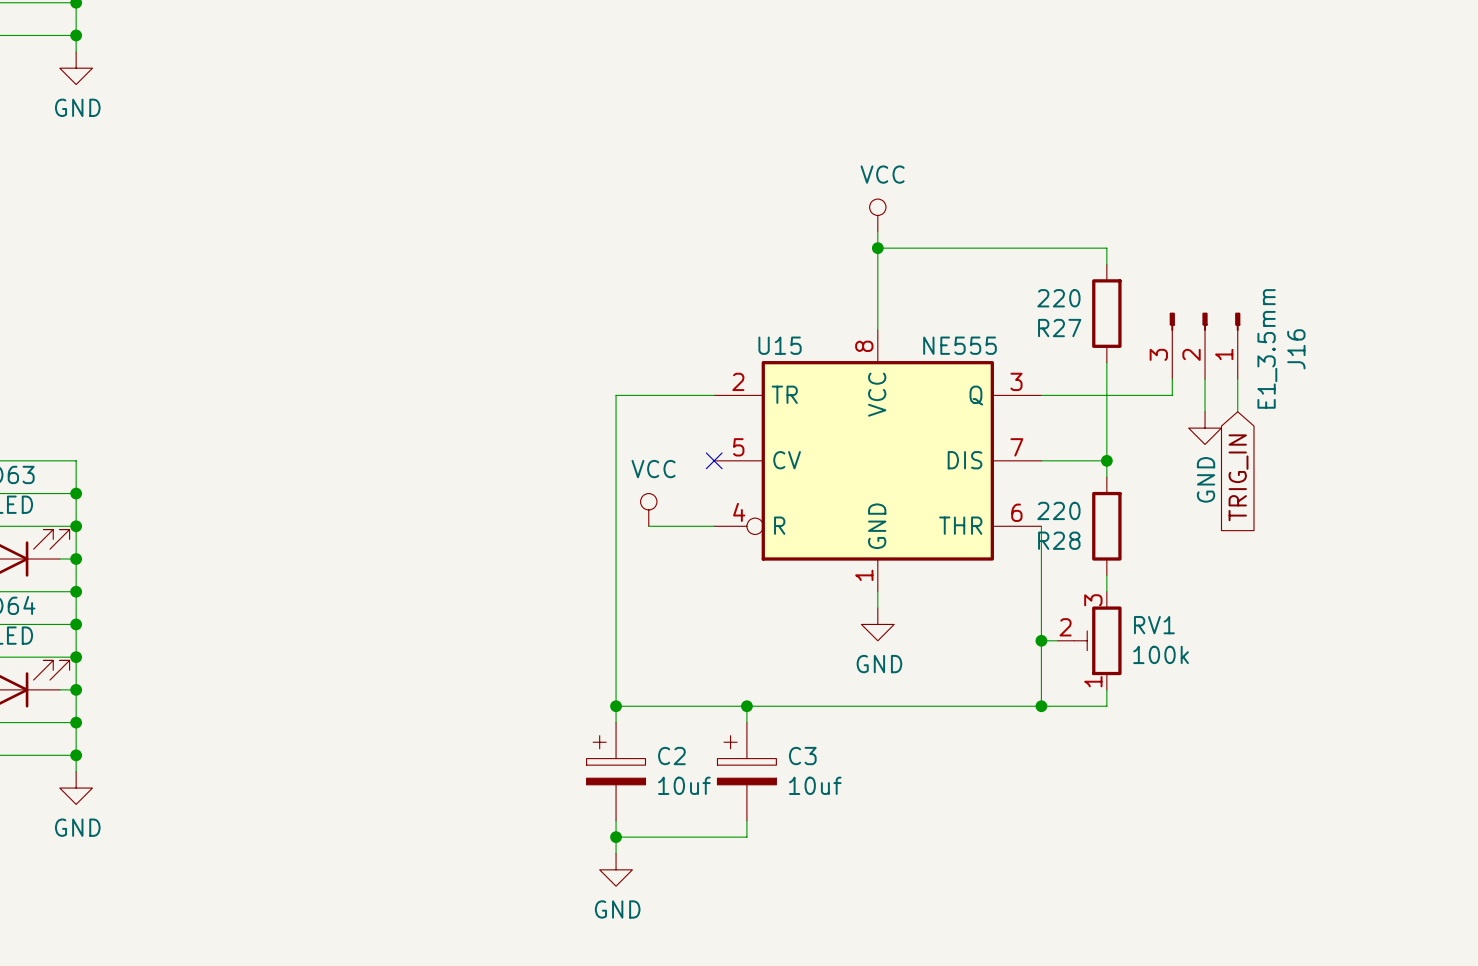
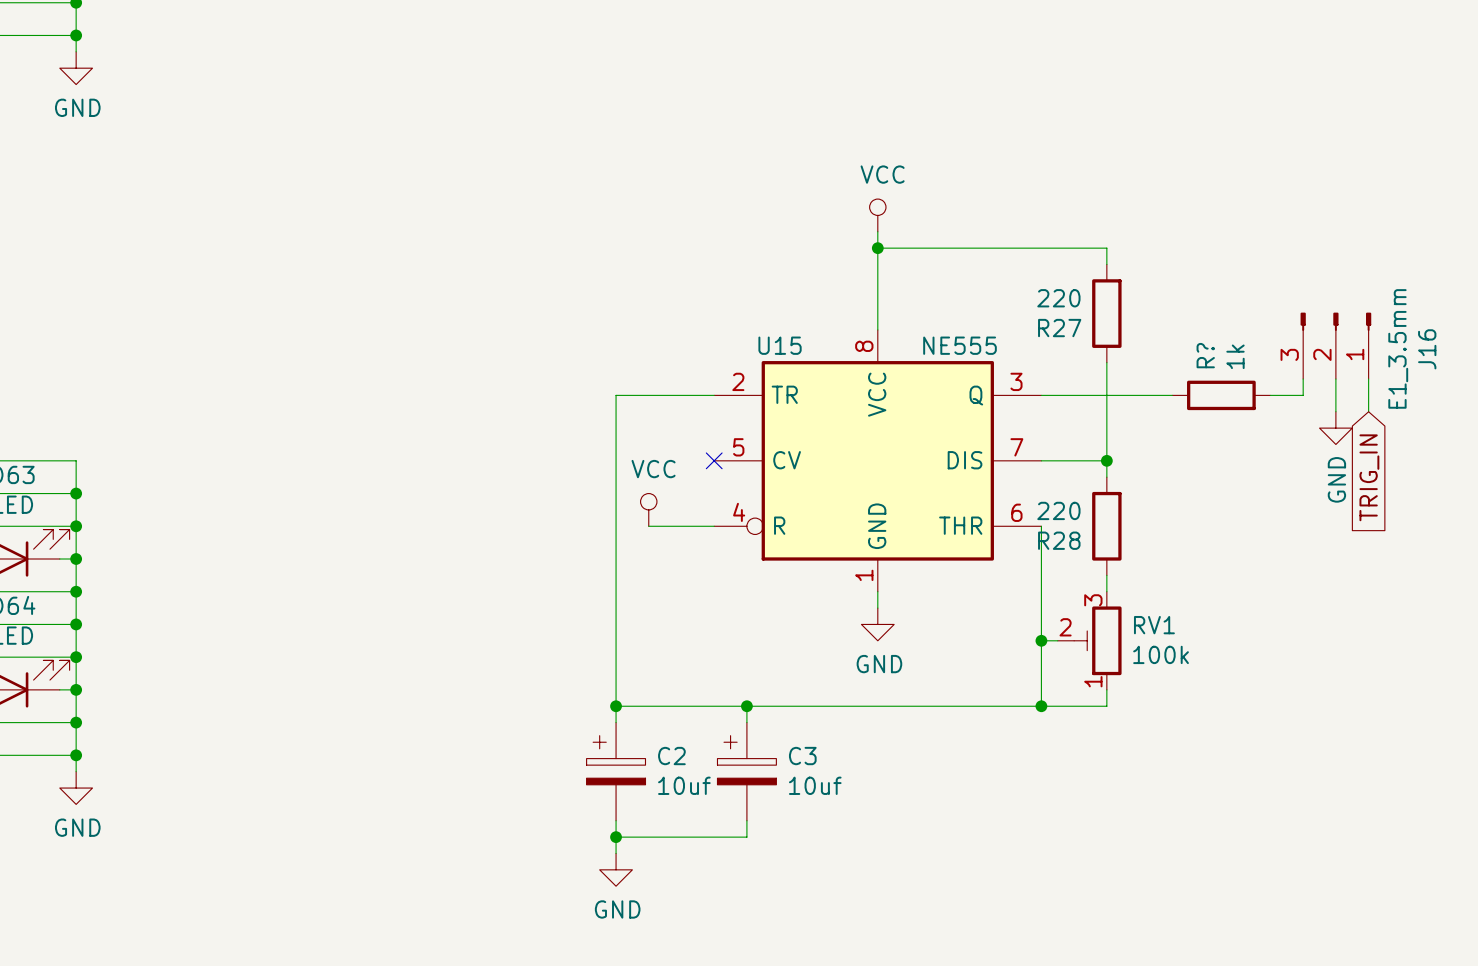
J16 position: (1205, 345) -> (1335, 345)
wire: (1172, 379) (1172, 395) -> none
wire: (1205, 379) (1205, 411) -> (1368, 379) (1368, 411)
wire: (1237, 379) (1237, 411) -> (1335, 379) (1335, 411)
wire: none -> (1303, 379) (1303, 395) (1270, 395)
R?: none -> 1k (1221, 395)
power symbol position: GND (1205, 428) -> GND (1335, 428)
global label position: TRIG_IN (1238, 477) -> TRIG_IN (1369, 477)

